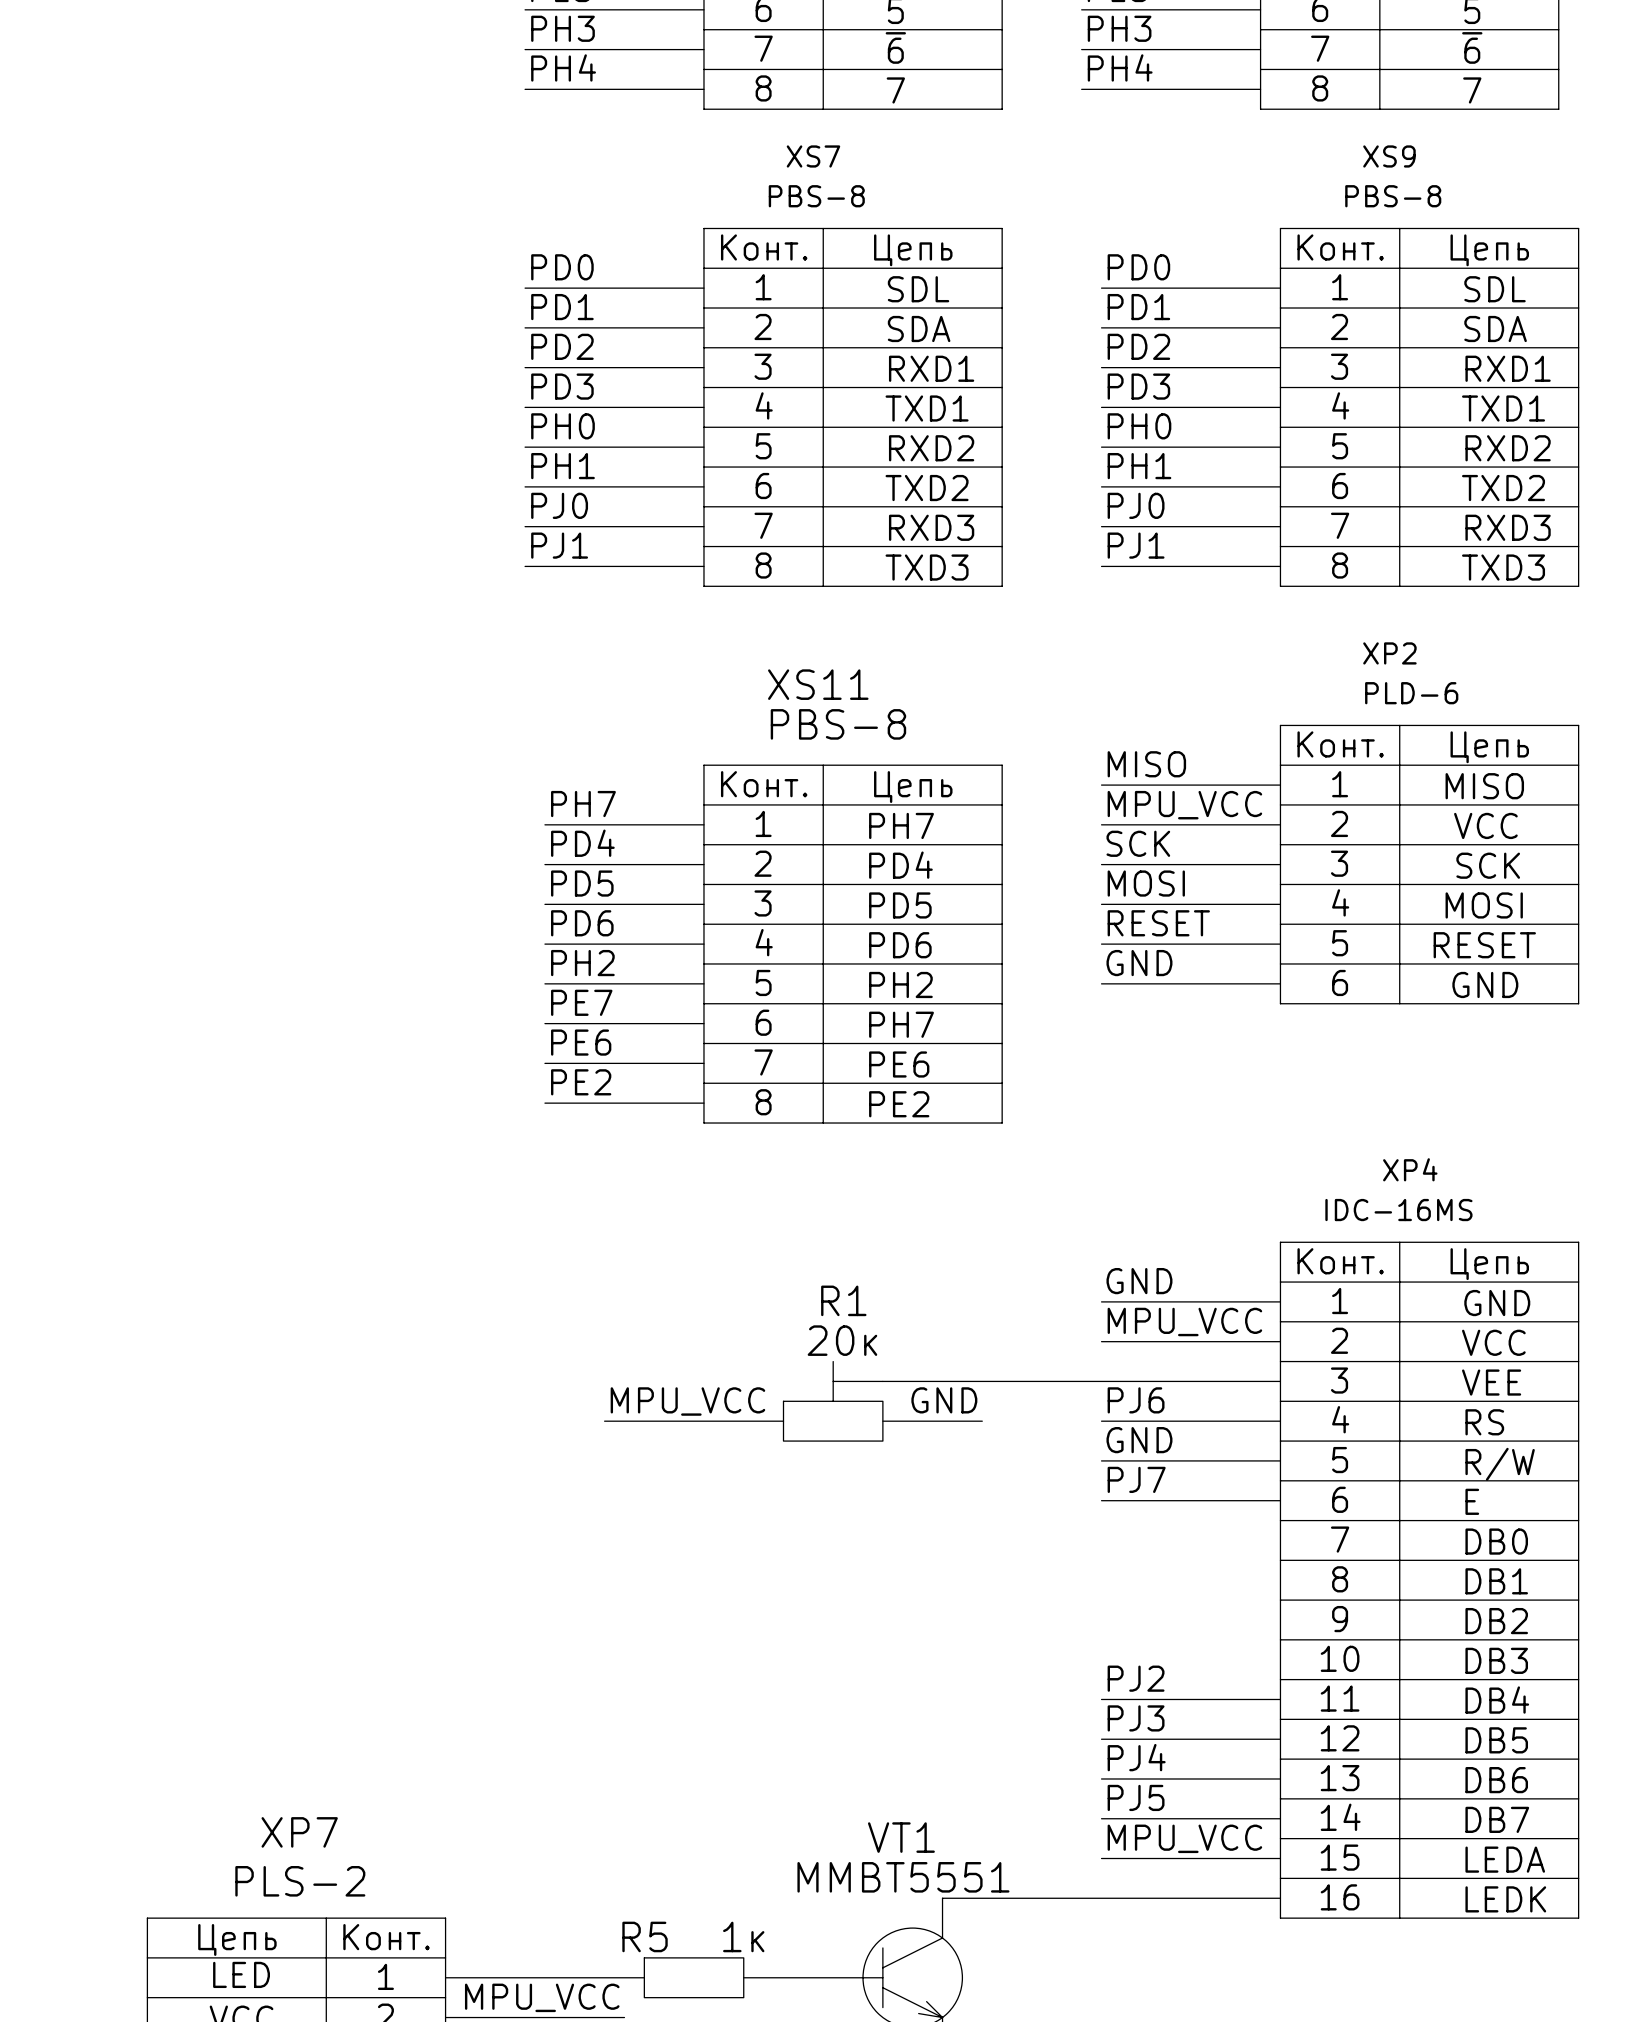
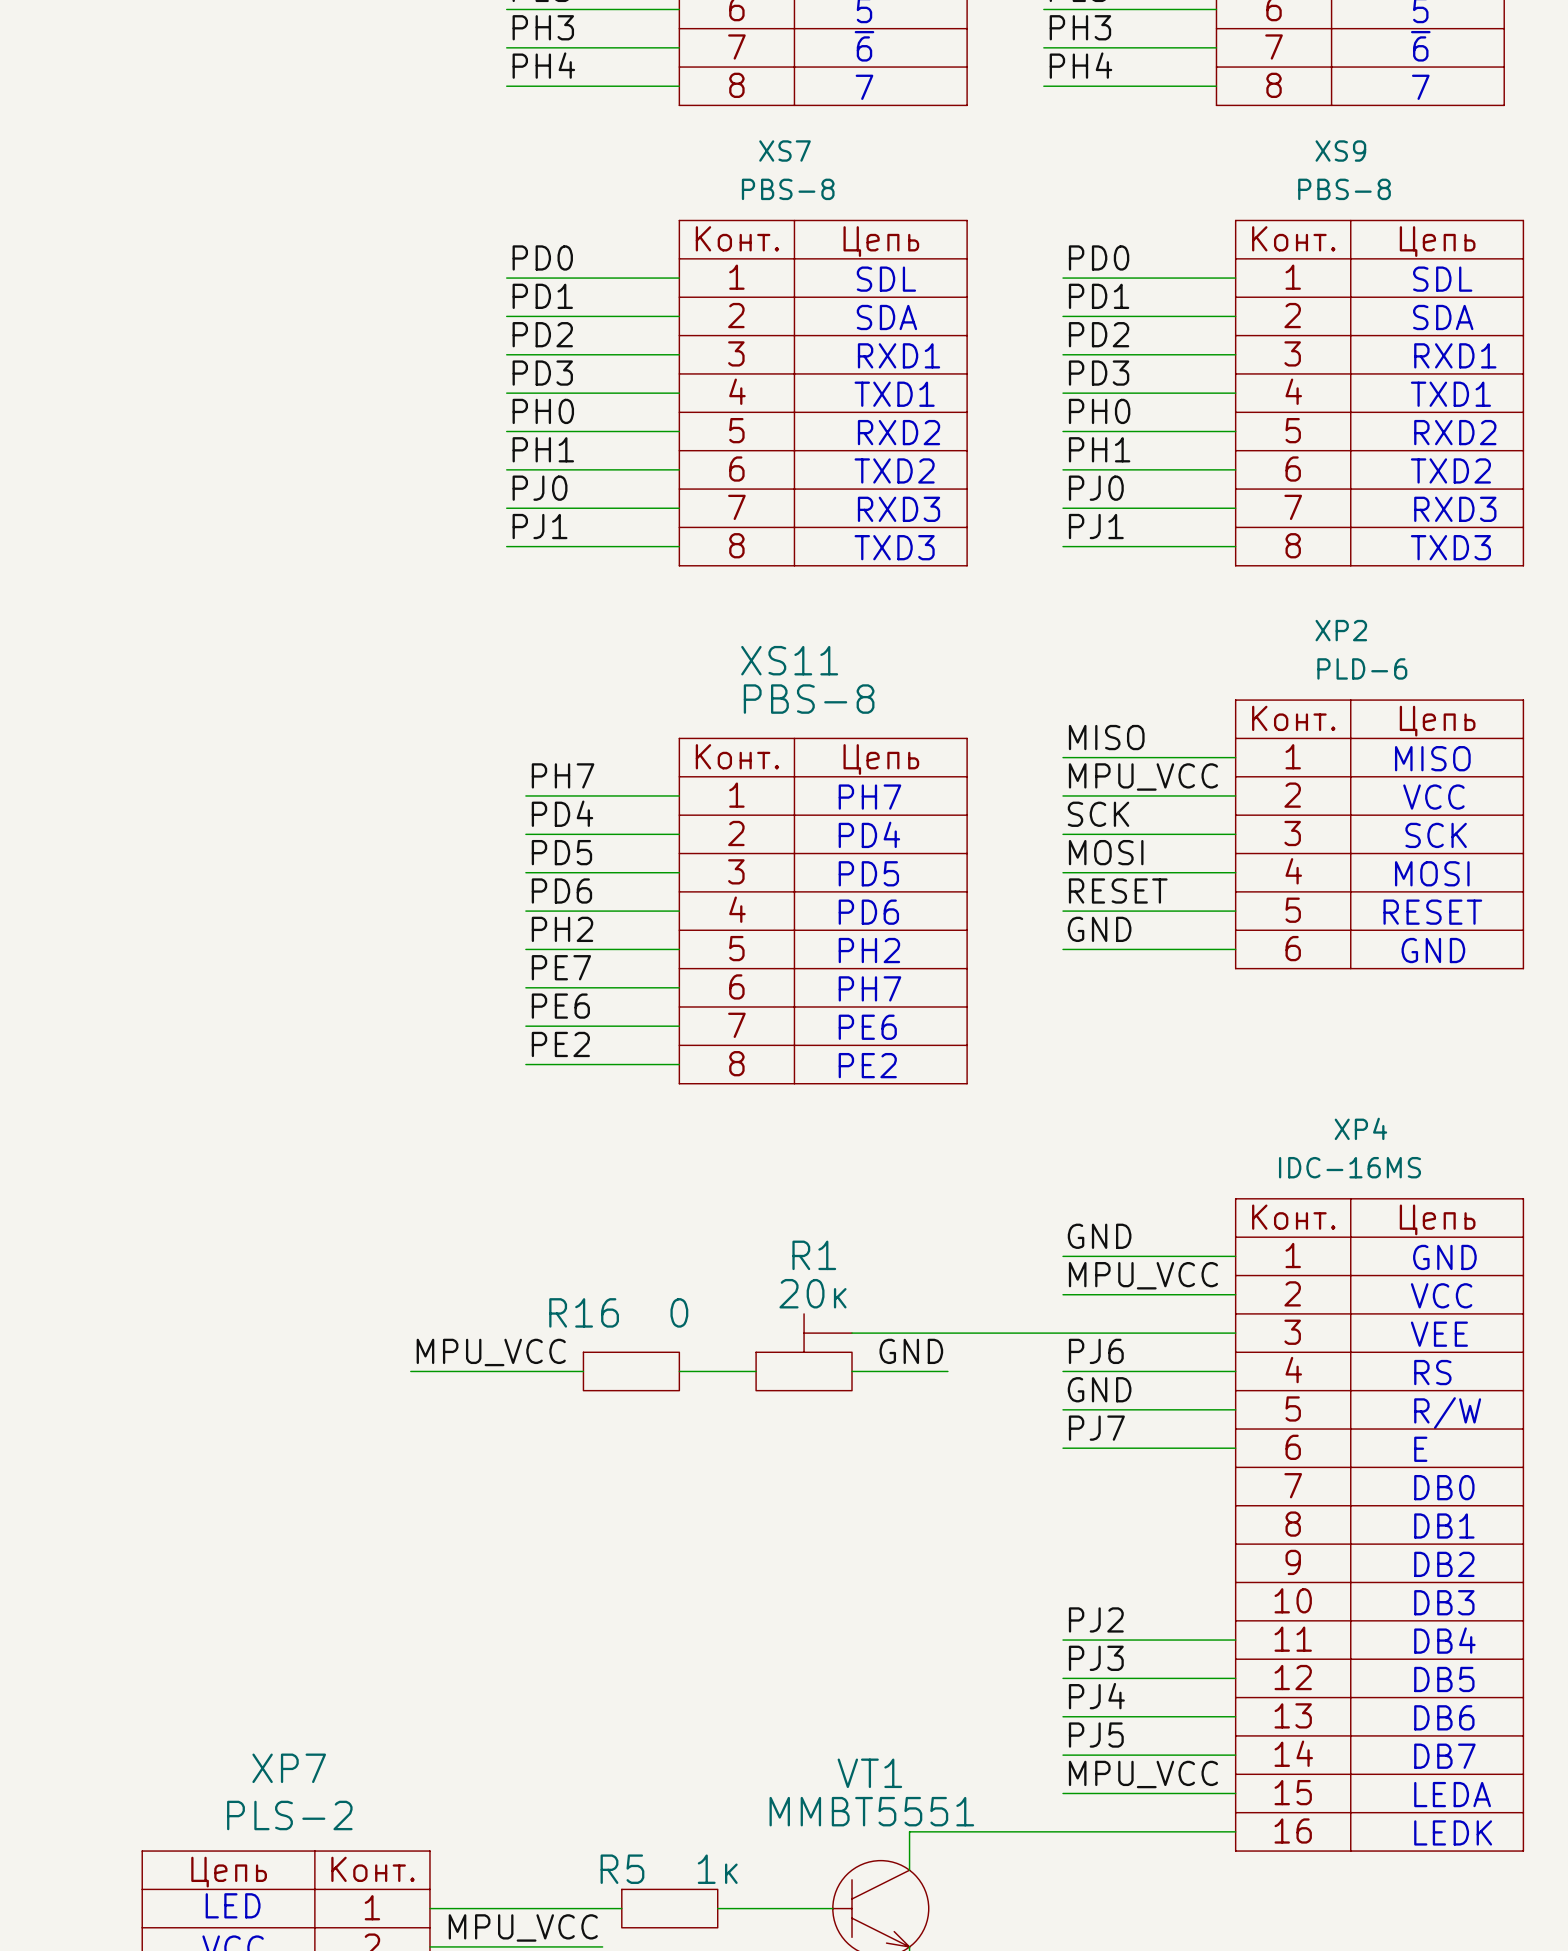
label position: MPU_VCC (687, 1401) -> MPU_VCC (491, 1352)
wire: (604, 1421) (703, 1421) -> (583, 1371) (410, 1371)
R16: none -> 0 (631, 1371)

